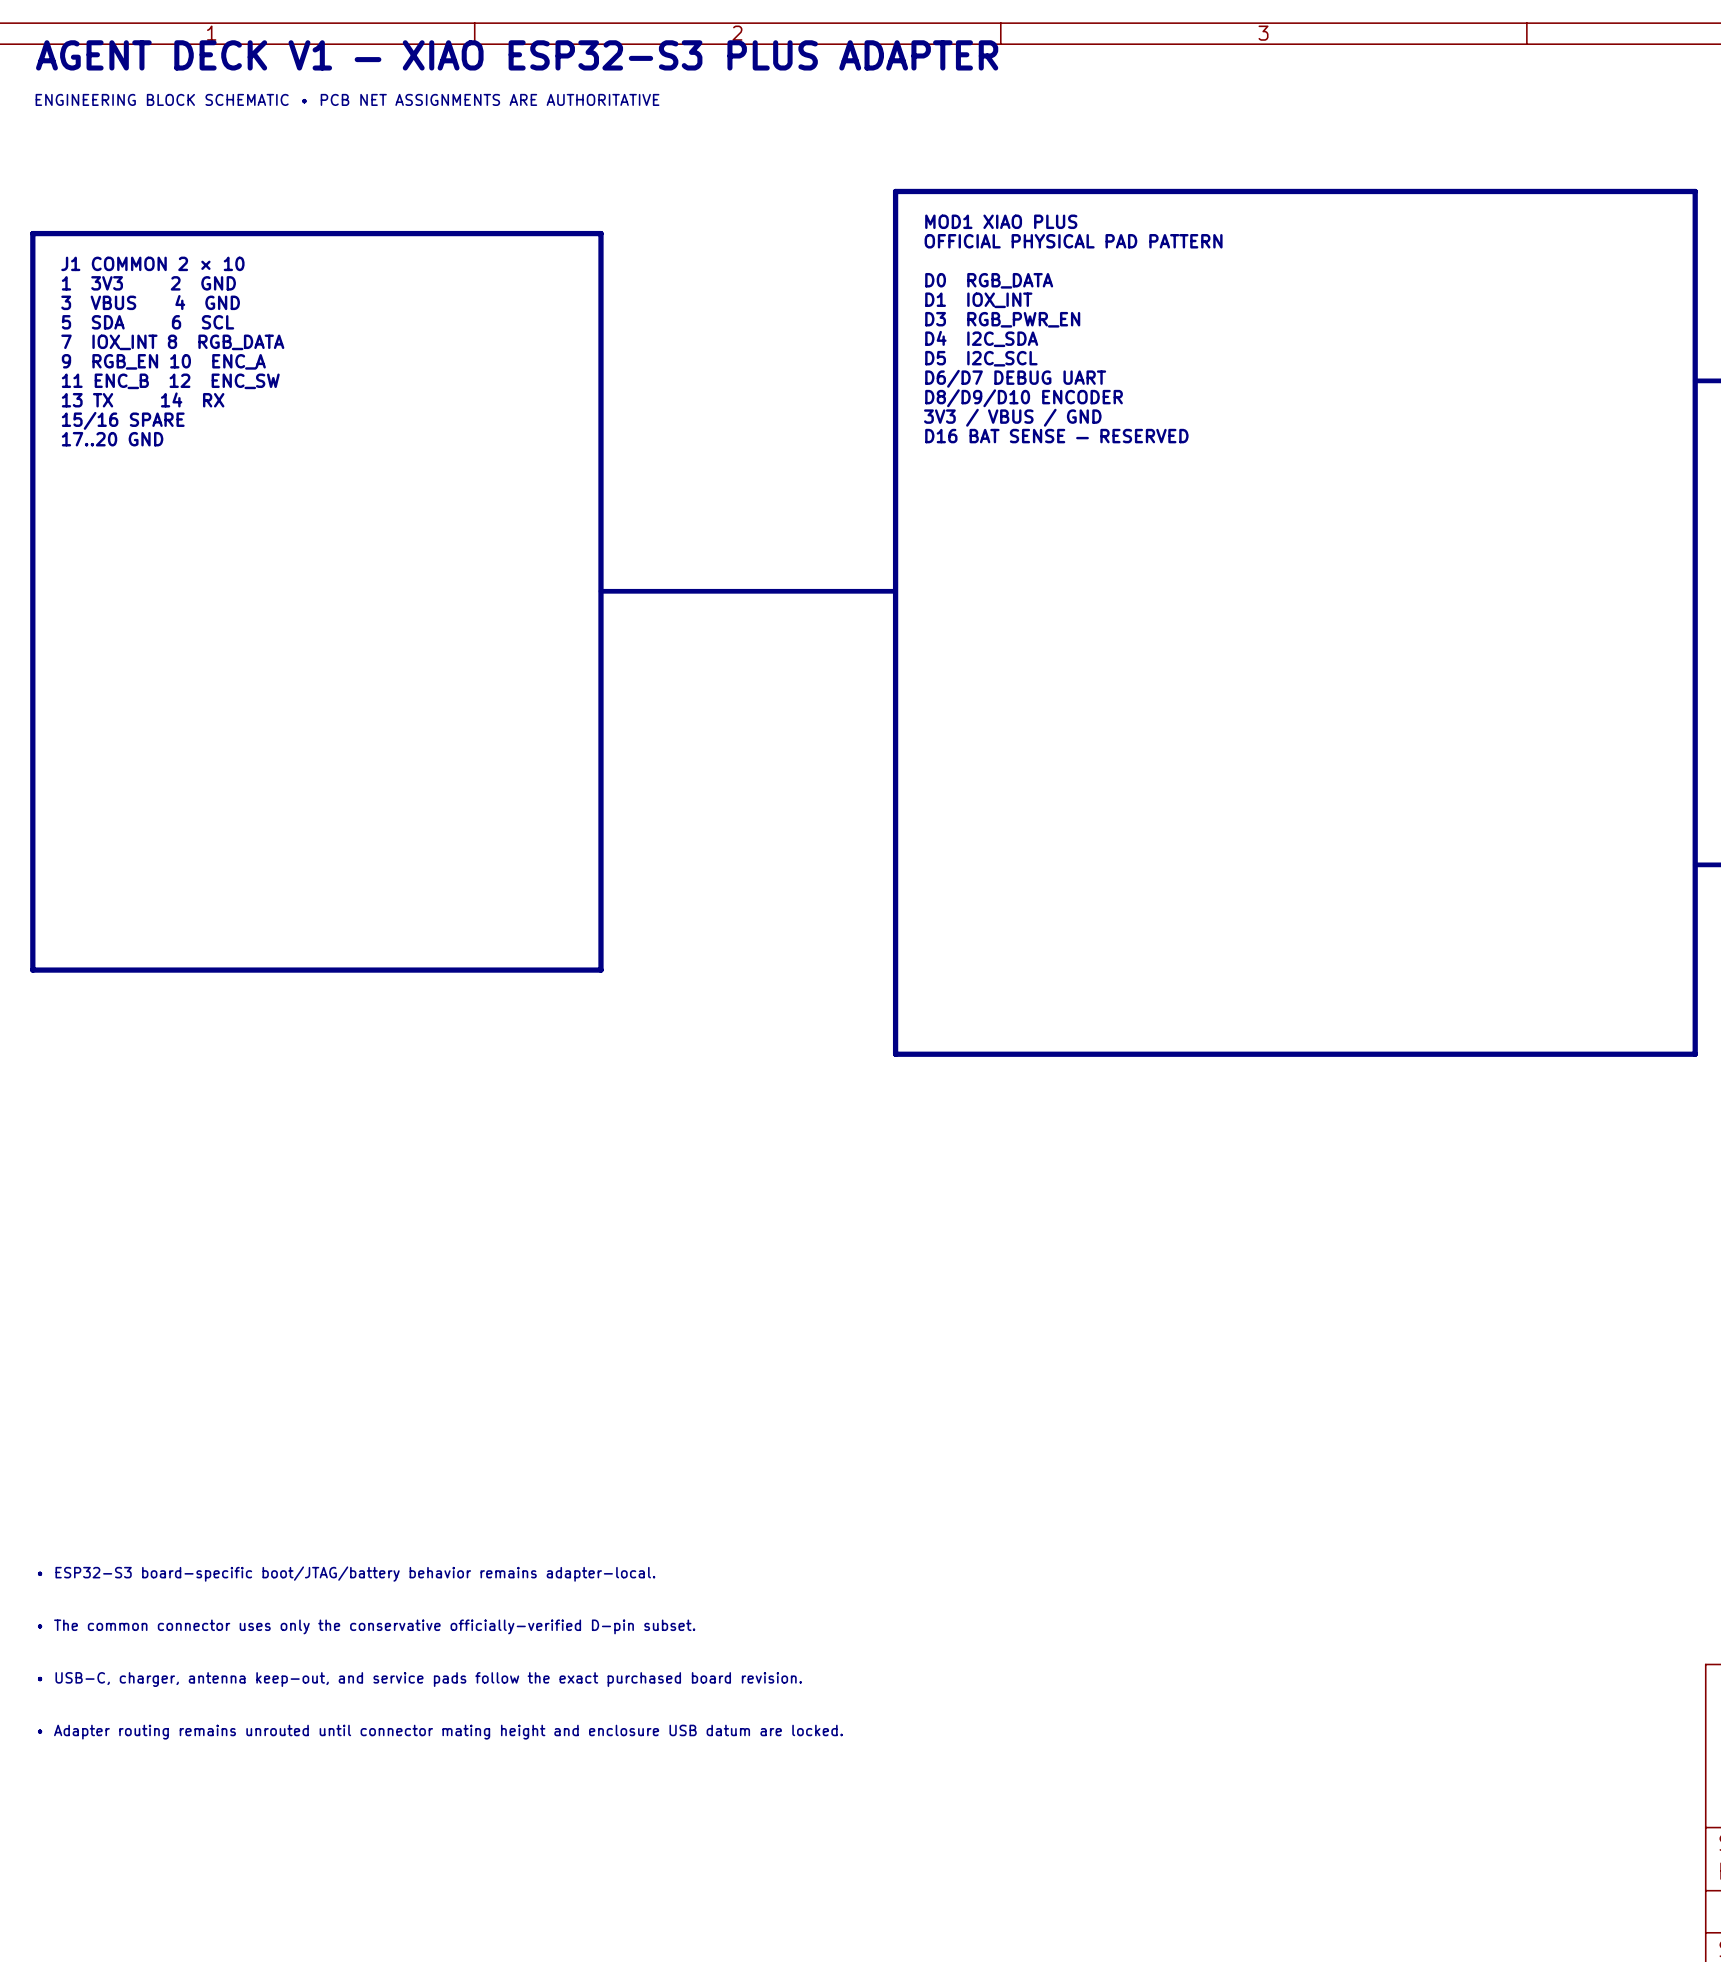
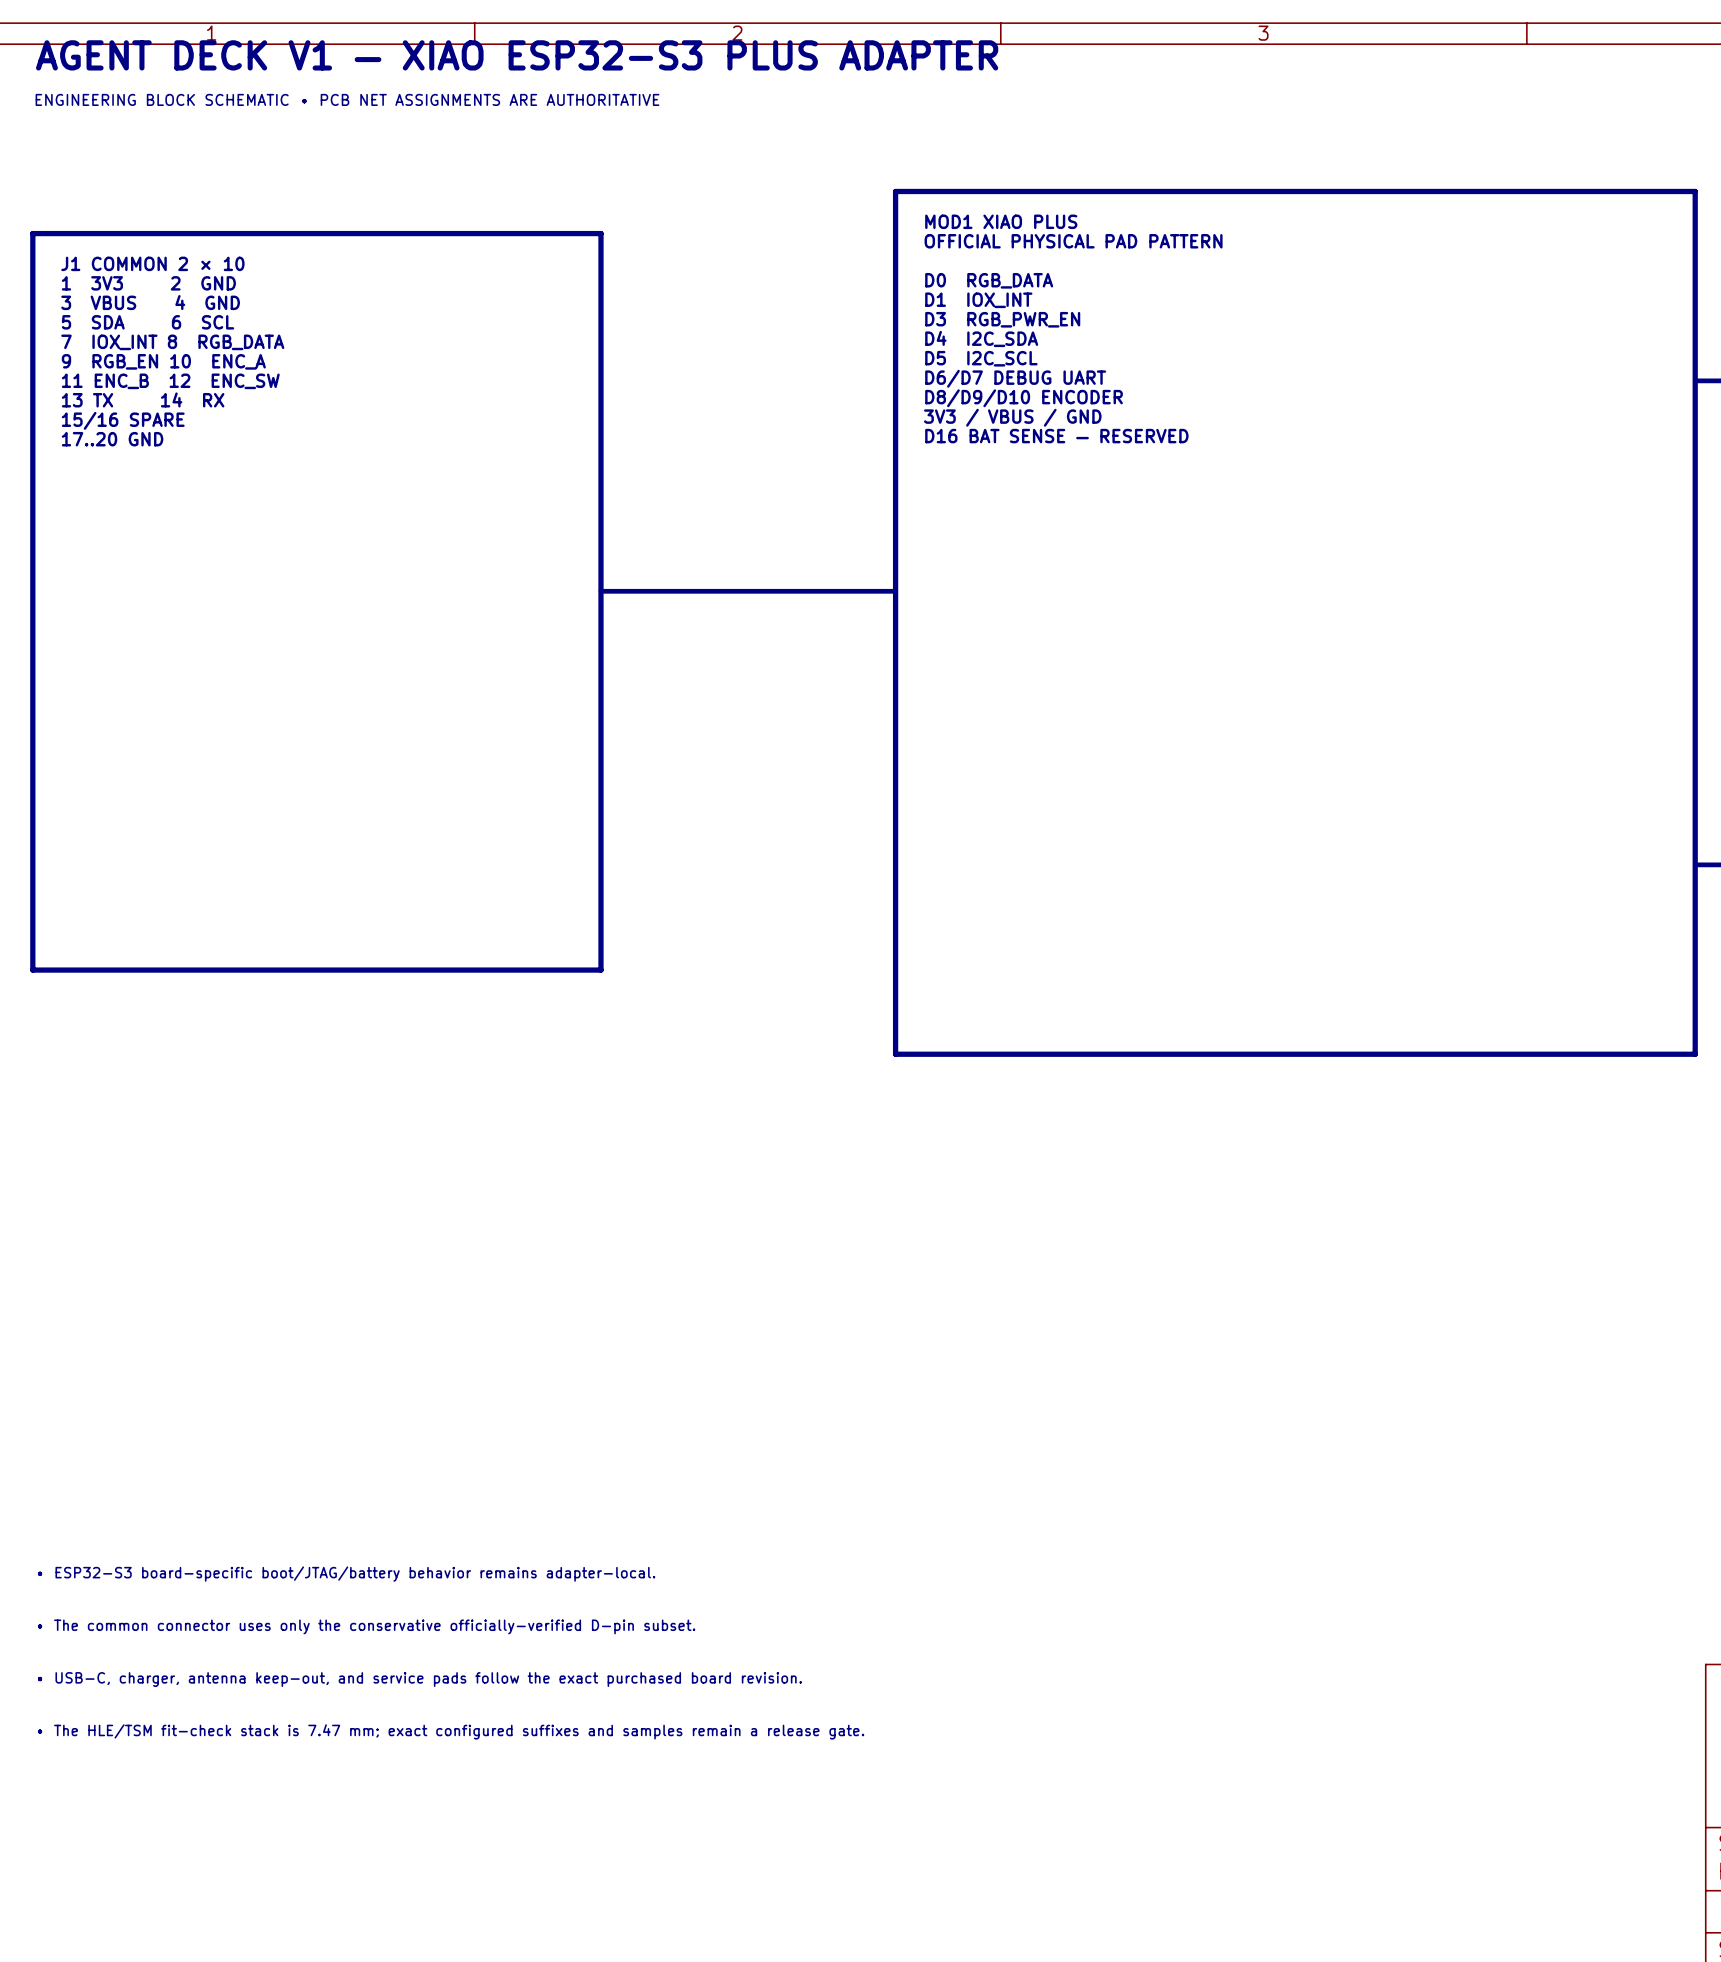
text: • Adapter routing remains unrouted until connector mating height and enclosure USB datum are locked. (440, 1732) -> • The HLE/TSM fit-check stack is 7.47 mm; exact configured suffixes and samples remain a release gate. (451, 1731)

